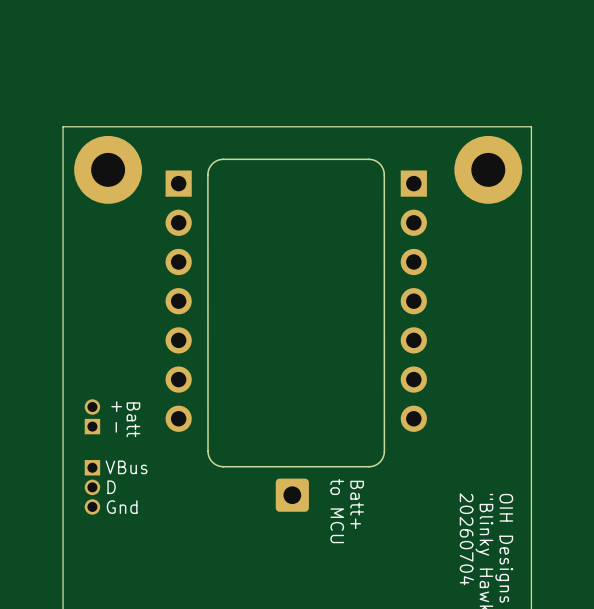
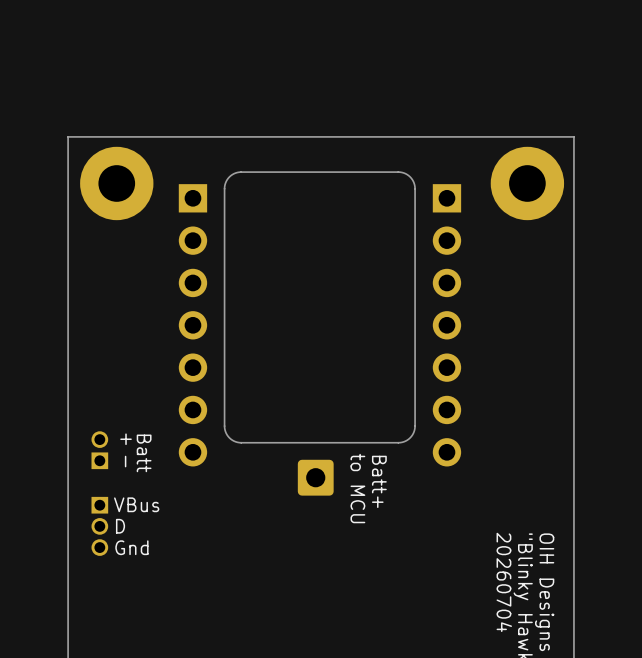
board edge: (384, 174) (384, 451) (379, 462) (368, 466) (223, 466) (215, 464) (209, 458) (207, 174) -> (415, 188) (414, 427) (408, 439) (398, 442) (241, 442) (232, 440) (227, 434) (224, 426) (224, 188)
part position: (292, 495) -> (315, 477)
text position: Batt+ (357, 504) -> Batt+ (379, 481)
text position: to MCU (337, 511) -> to MCU (357, 488)

